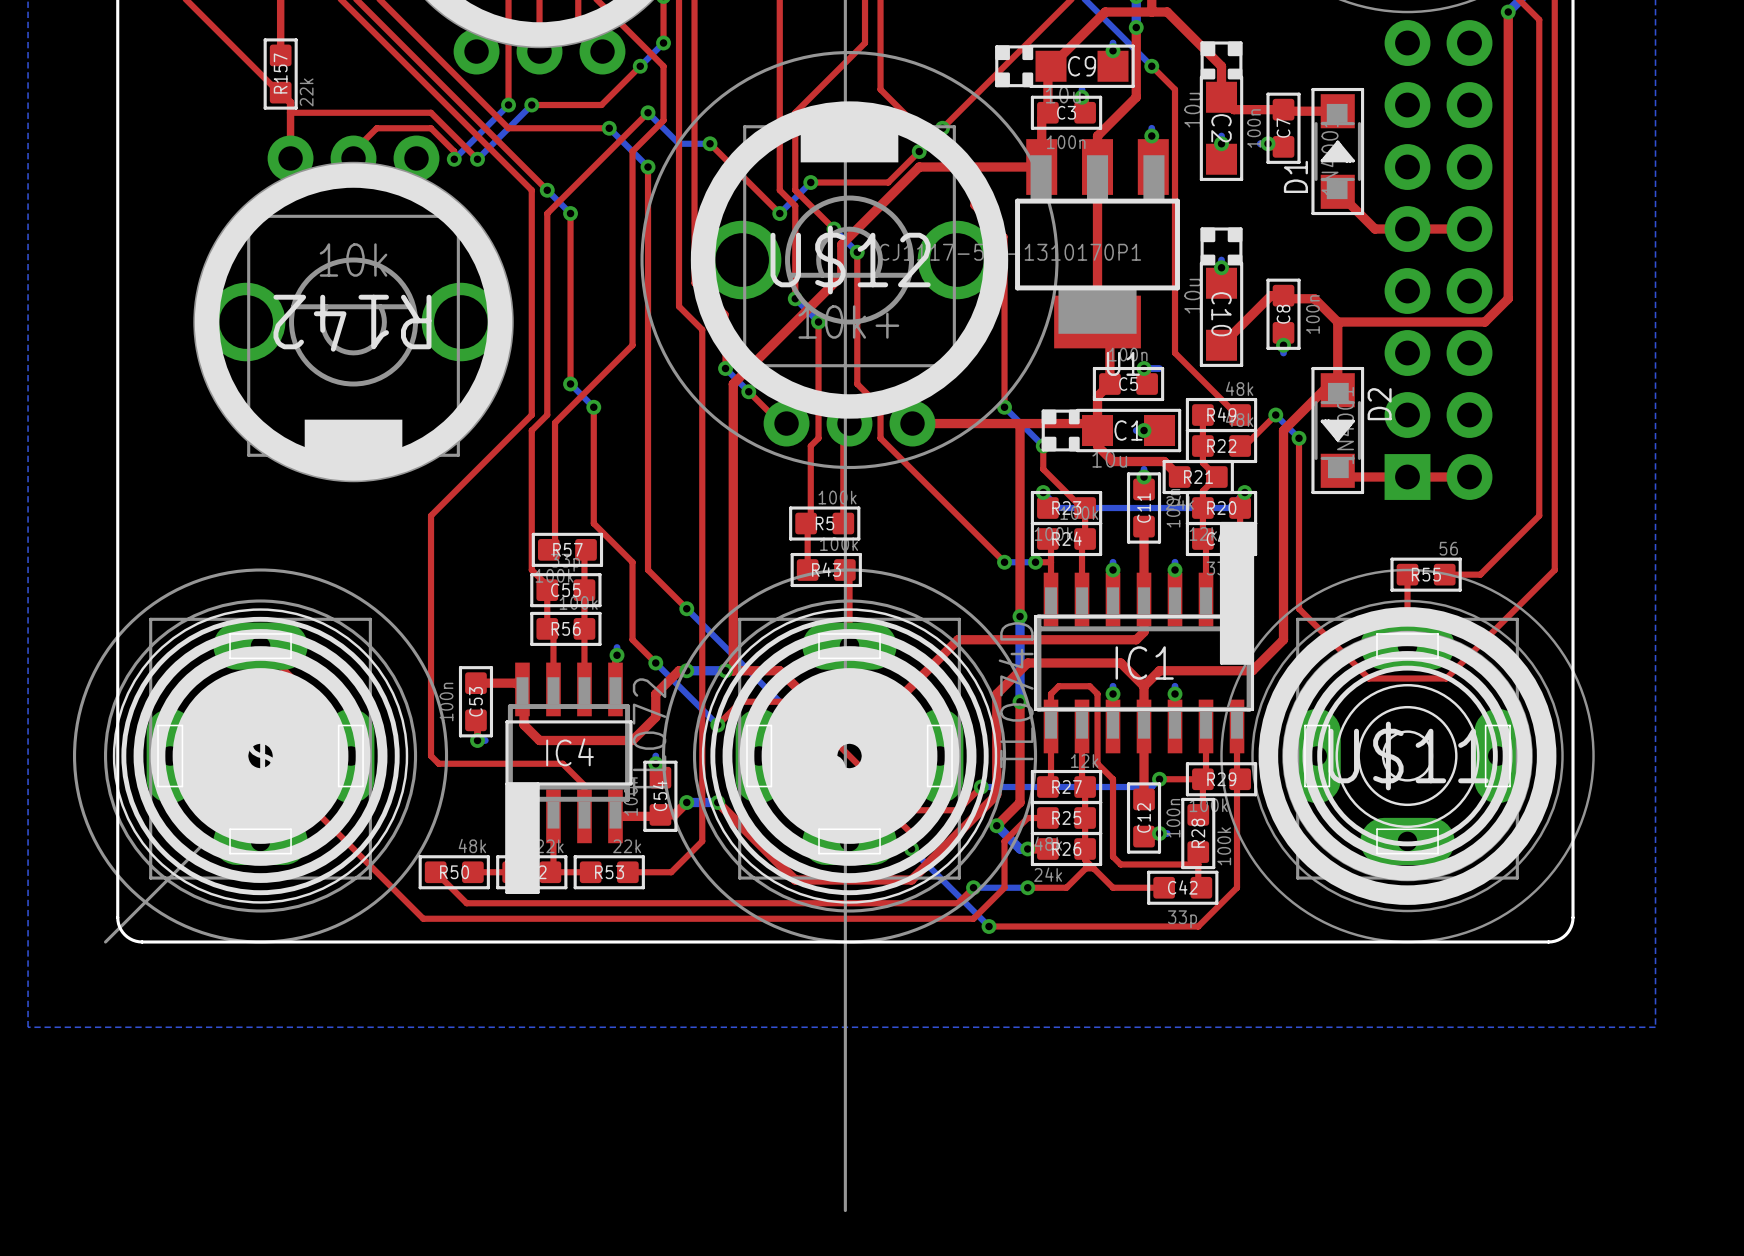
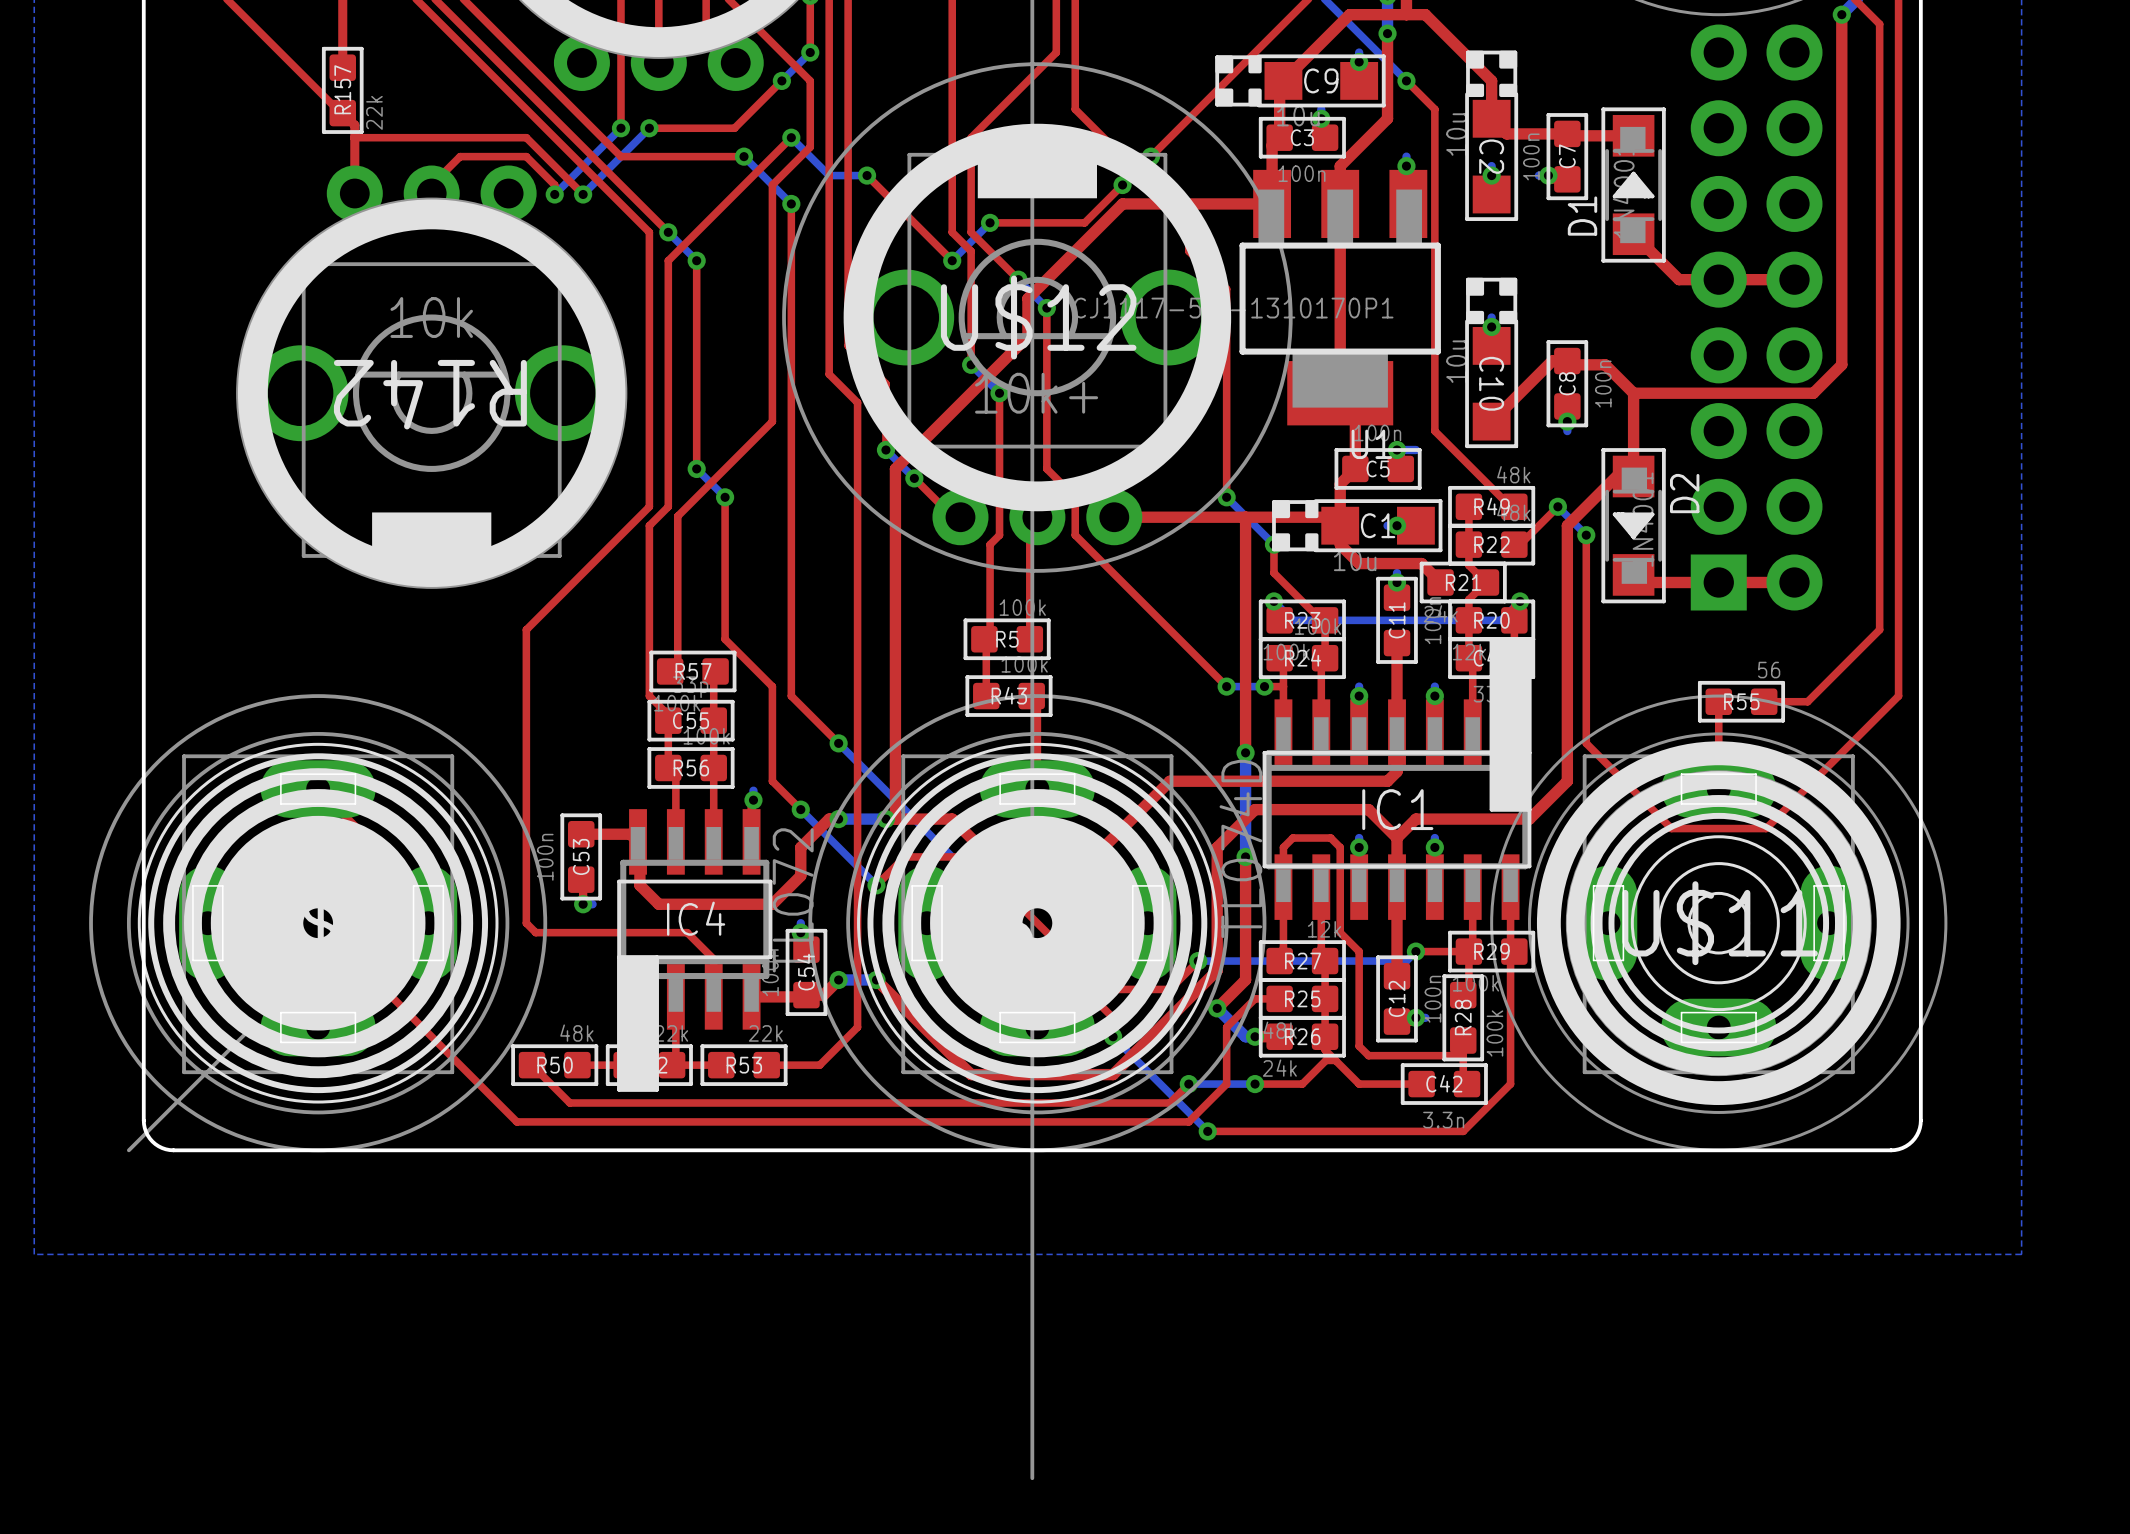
C42 value: 33p (1182, 919) -> 3.3n (1443, 1120)

